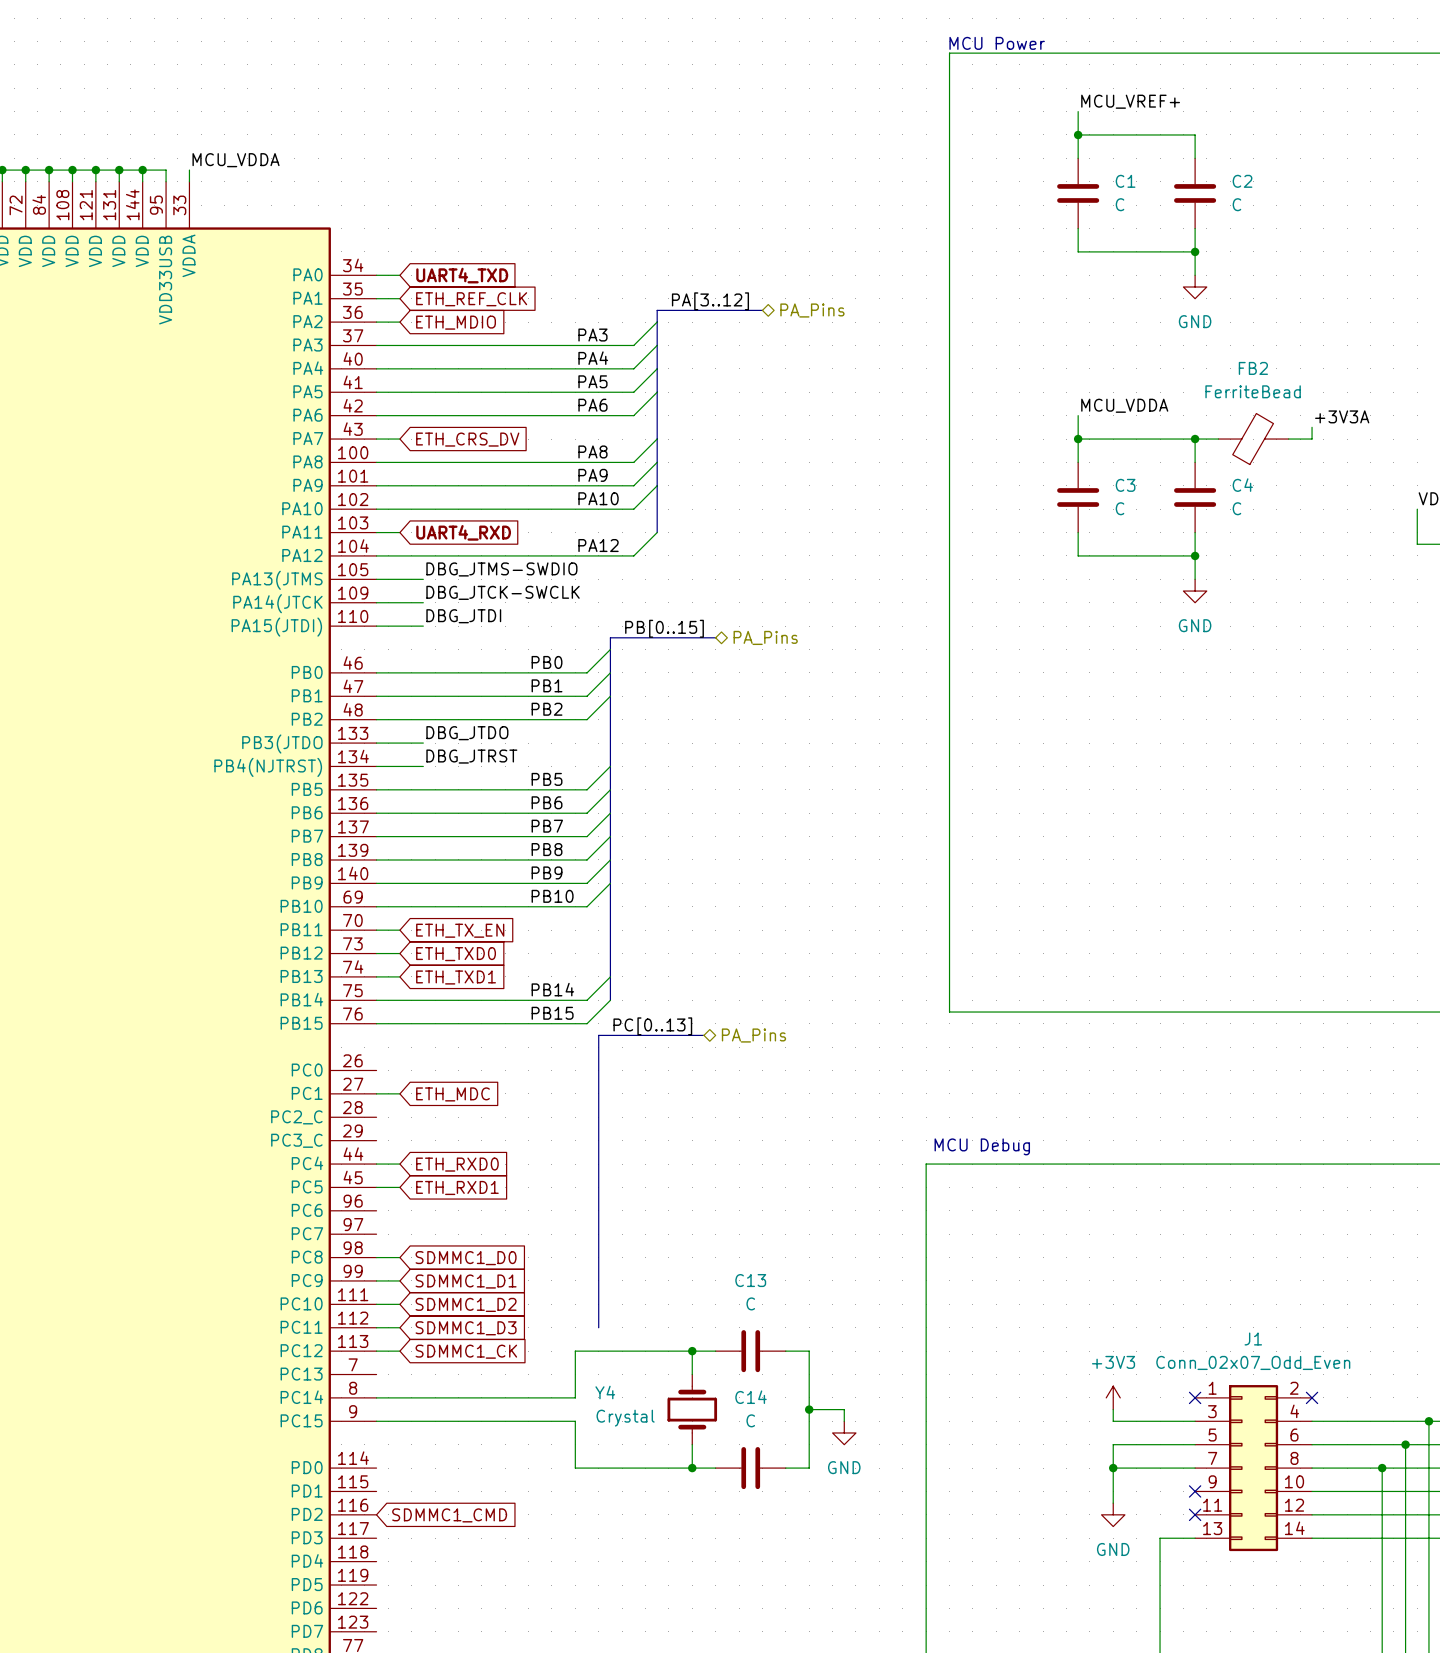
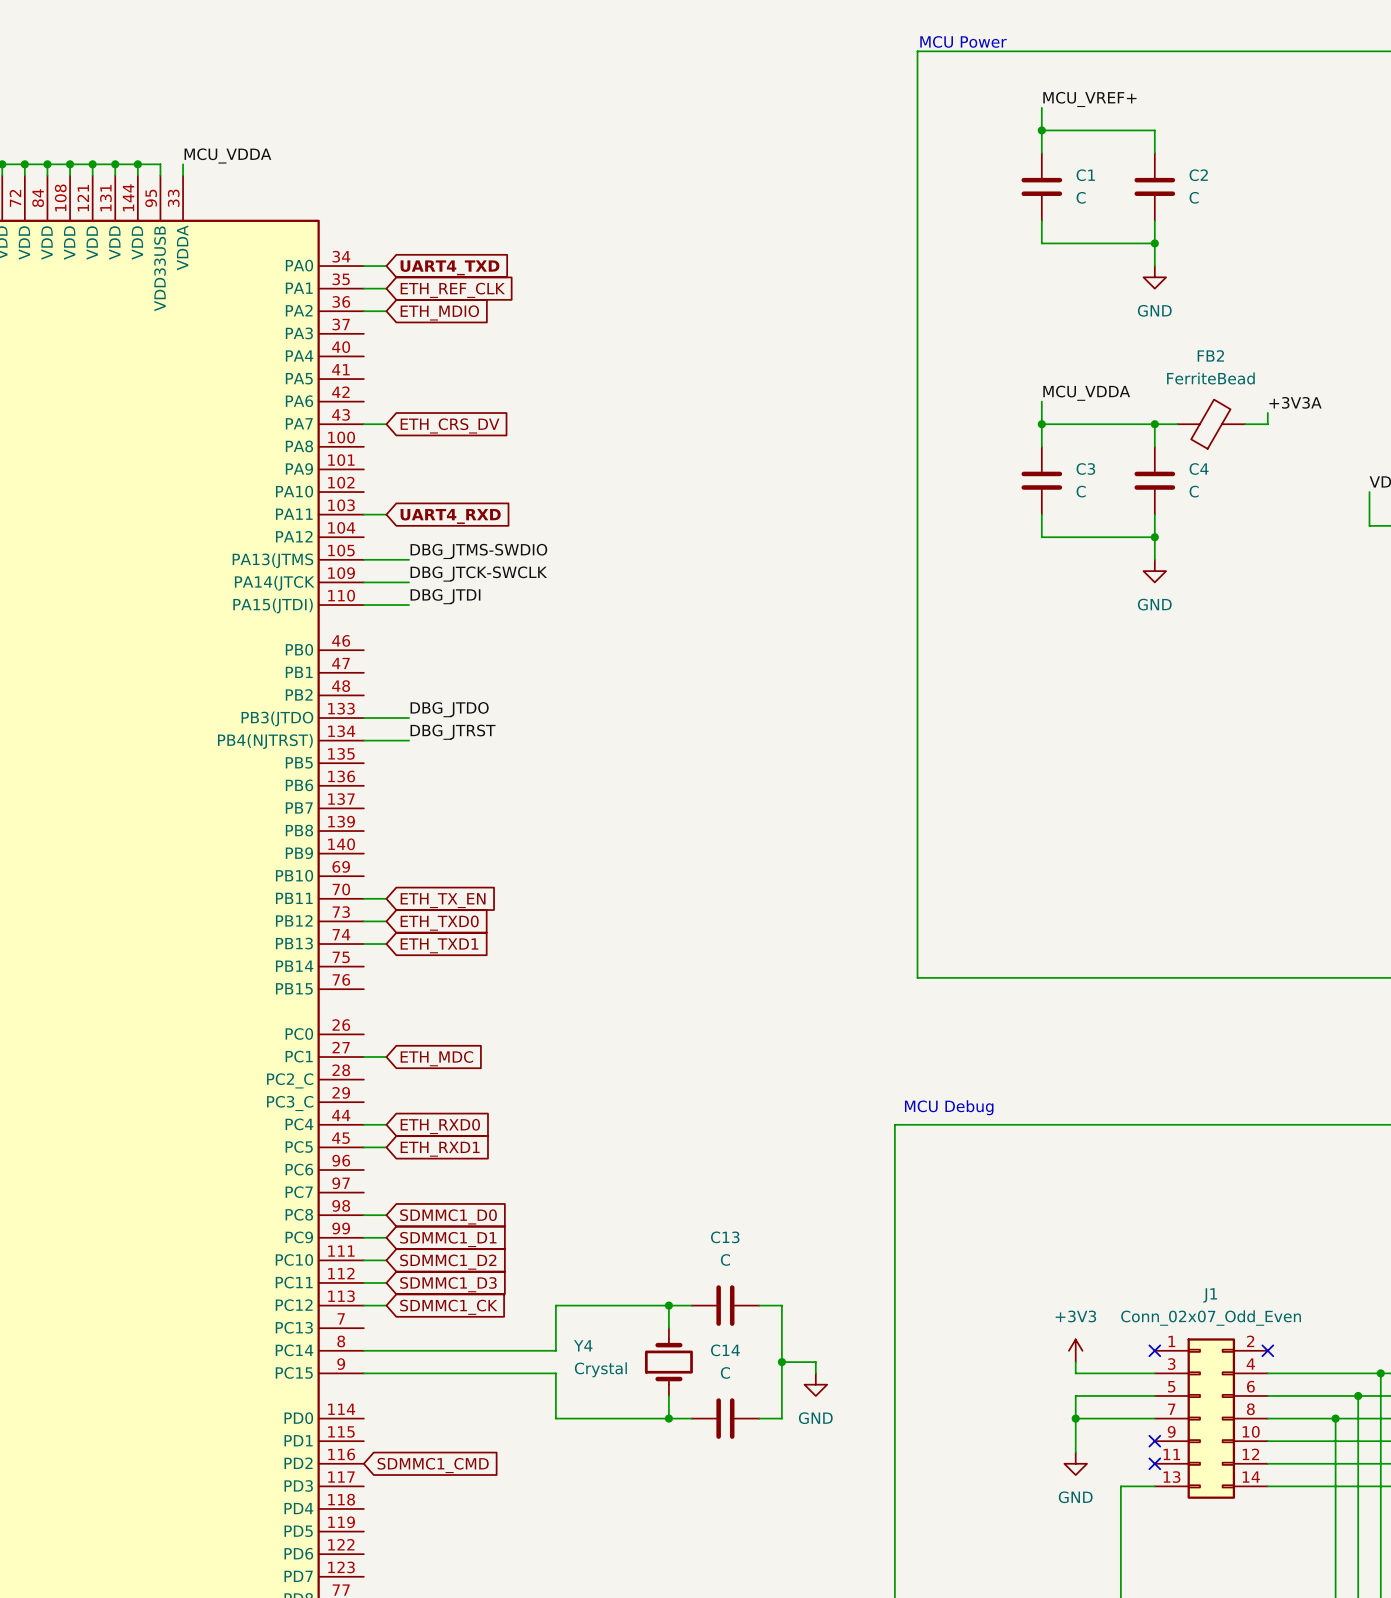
label: PA[3..12] (710, 301) -> none
bus: (762, 310) (657, 310) (657, 532) -> none
hierarchical label: PA_Pins (812, 310) -> none
wire: (657, 322) (633, 345) (376, 345) -> none
label: PA3 (592, 335) -> none
wire: (657, 345) (633, 368) (376, 368) -> none
label: PA4 (593, 358) -> none
wire: (657, 368) (633, 392) (376, 392) -> none
label: PA5 (592, 381) -> none
wire: (657, 392) (633, 415) (376, 415) -> none
label: PA6 (592, 405) -> none
wire: (657, 439) (633, 462) (376, 462) -> none
label: PA8 (592, 451) -> none
wire: (657, 462) (633, 485) (376, 485) -> none
label: PA9 (592, 475) -> none
wire: (657, 485) (633, 509) (376, 509) -> none
label: PA10 (598, 498) -> none
wire: (657, 532) (633, 555) (376, 555) -> none
label: PA12 (598, 545) -> none
label: PB[0..15] (664, 628) -> none
bus: (715, 637) (610, 637) (610, 1000) -> none
hierarchical label: PA_Pins (765, 637) -> none
wire: (610, 649) (587, 672) (376, 672) -> none
label: PB0 (547, 662) -> none
wire: (610, 672) (587, 696) (376, 696) -> none
label: PB1 (547, 685) -> none
wire: (610, 696) (587, 719) (376, 719) -> none
label: PB2 (547, 709) -> none
wire: (610, 766) (587, 789) (376, 789) -> none
label: PB5 (547, 779) -> none
wire: (610, 789) (587, 813) (376, 813) -> none
label: PB6 (547, 802) -> none
wire: (610, 813) (587, 836) (376, 836) -> none
label: PB7 (547, 826) -> none
wire: (610, 836) (587, 859) (376, 859) -> none
label: PB8 (547, 849) -> none
wire: (610, 859) (587, 883) (376, 883) -> none
label: PB9 (547, 872) -> none
wire: (610, 883) (587, 906) (376, 906) -> none
label: PB10 (552, 896) -> none
wire: (610, 976) (587, 1000) (376, 1000) -> none
label: PB14 (552, 989) -> none
wire: (610, 1000) (587, 1023) (376, 1023) -> none
label: PB15 (552, 1013) -> none
label: PC[0..13] (652, 1026) -> none
bus: (703, 1035) (598, 1035) (598, 1327) -> none
hierarchical label: PA_Pins (753, 1035) -> none

